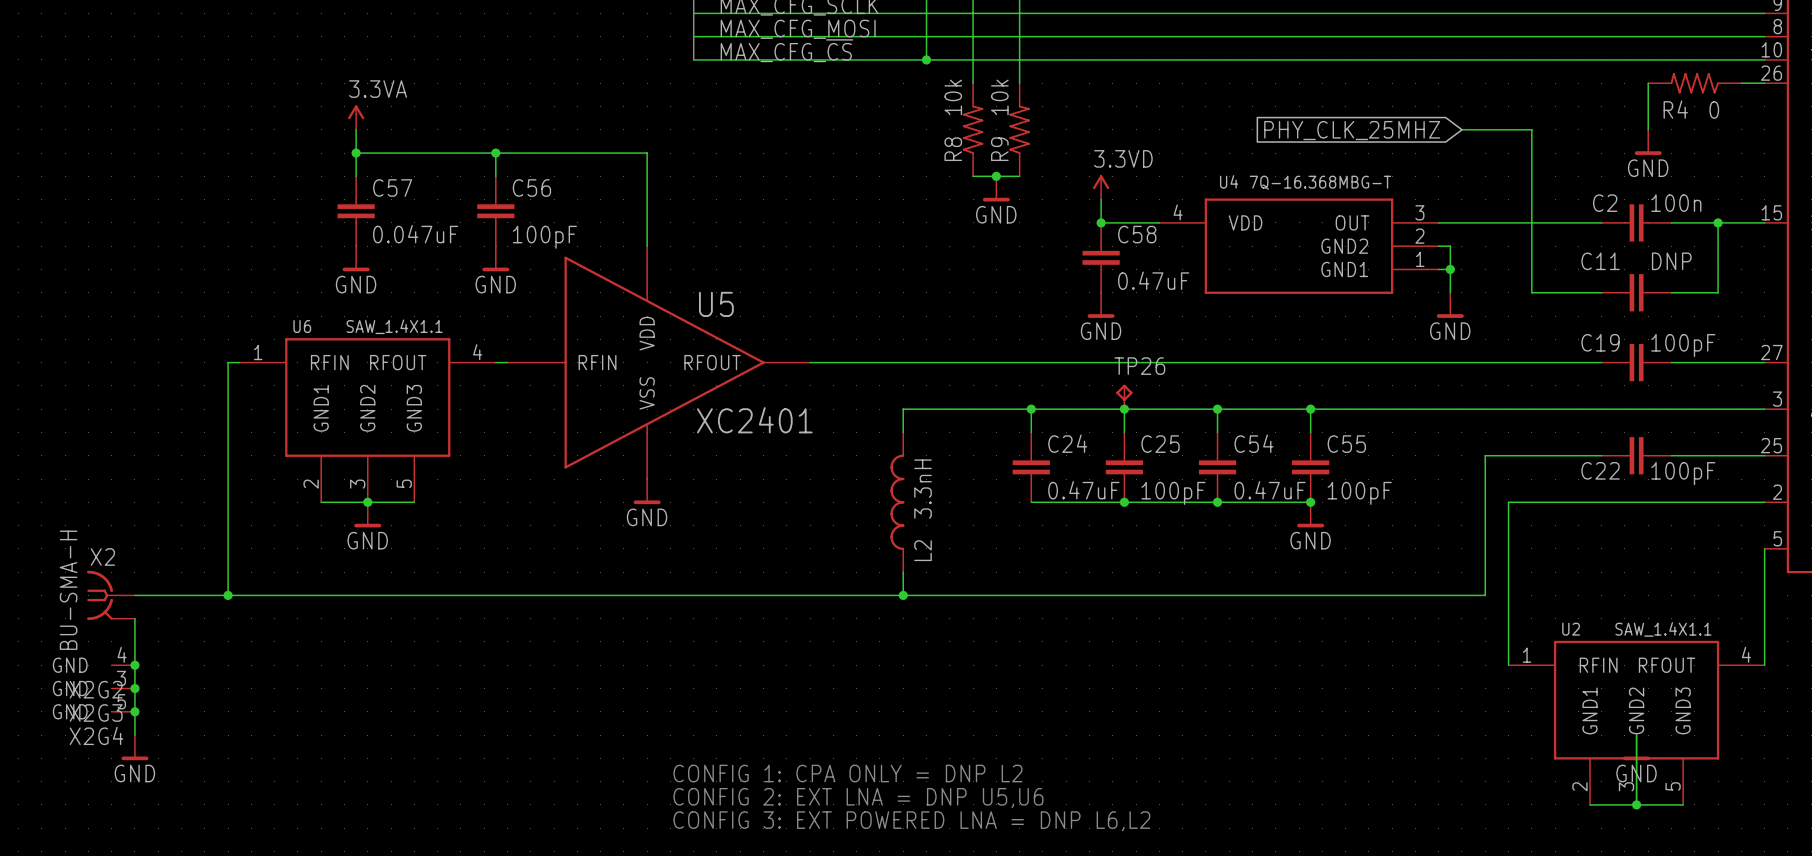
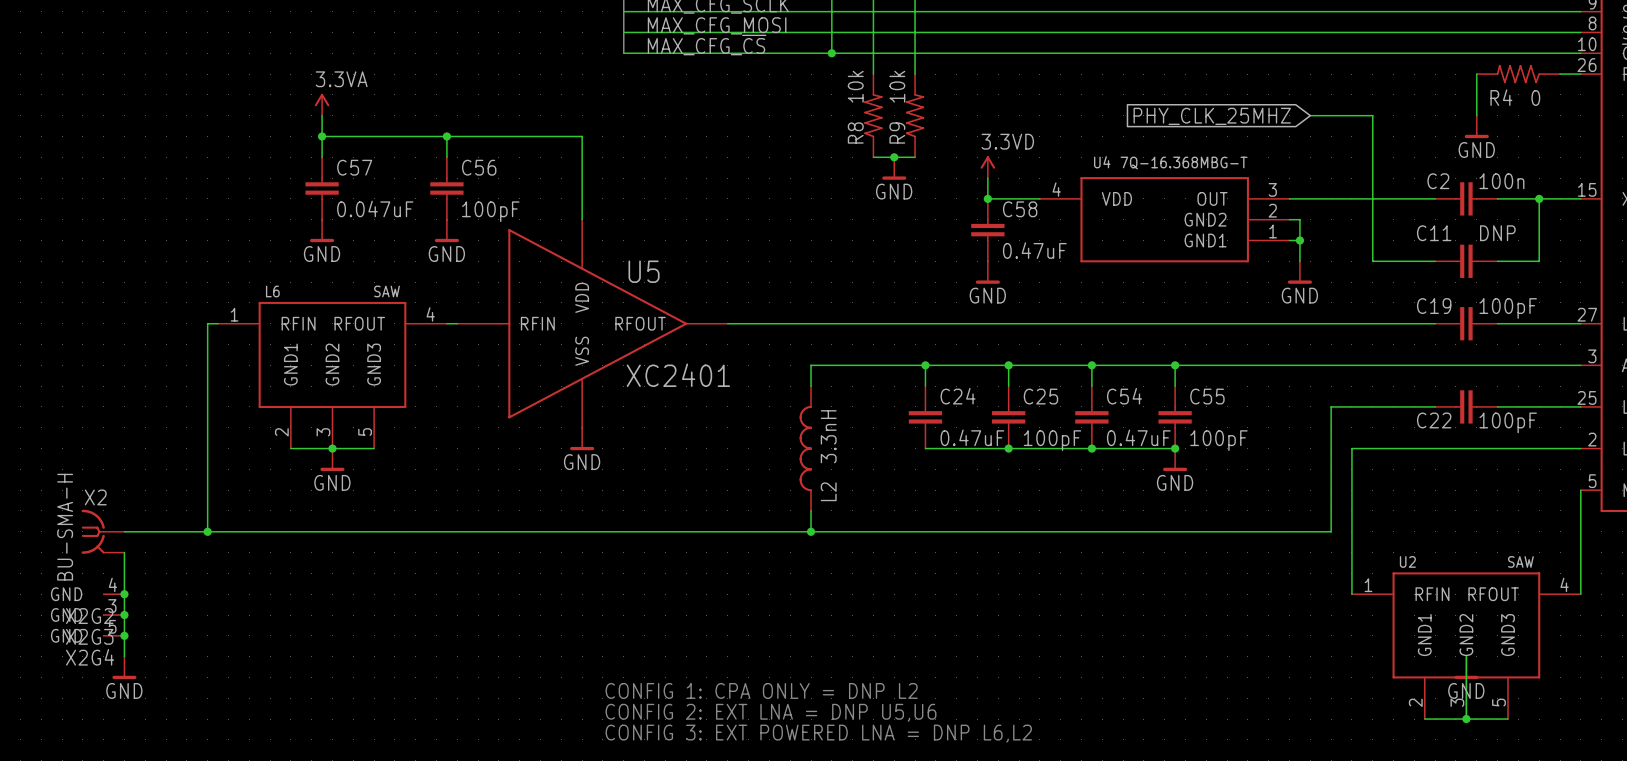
U6 name: U6 (302, 326) -> L6 (272, 291)
U6 value: SAW_1.4X1.1 (394, 326) -> SAW (387, 291)
TP26: (1124, 396) -> none
U2 value: SAW_1.4X1.1 (1663, 629) -> SAW (1520, 561)

